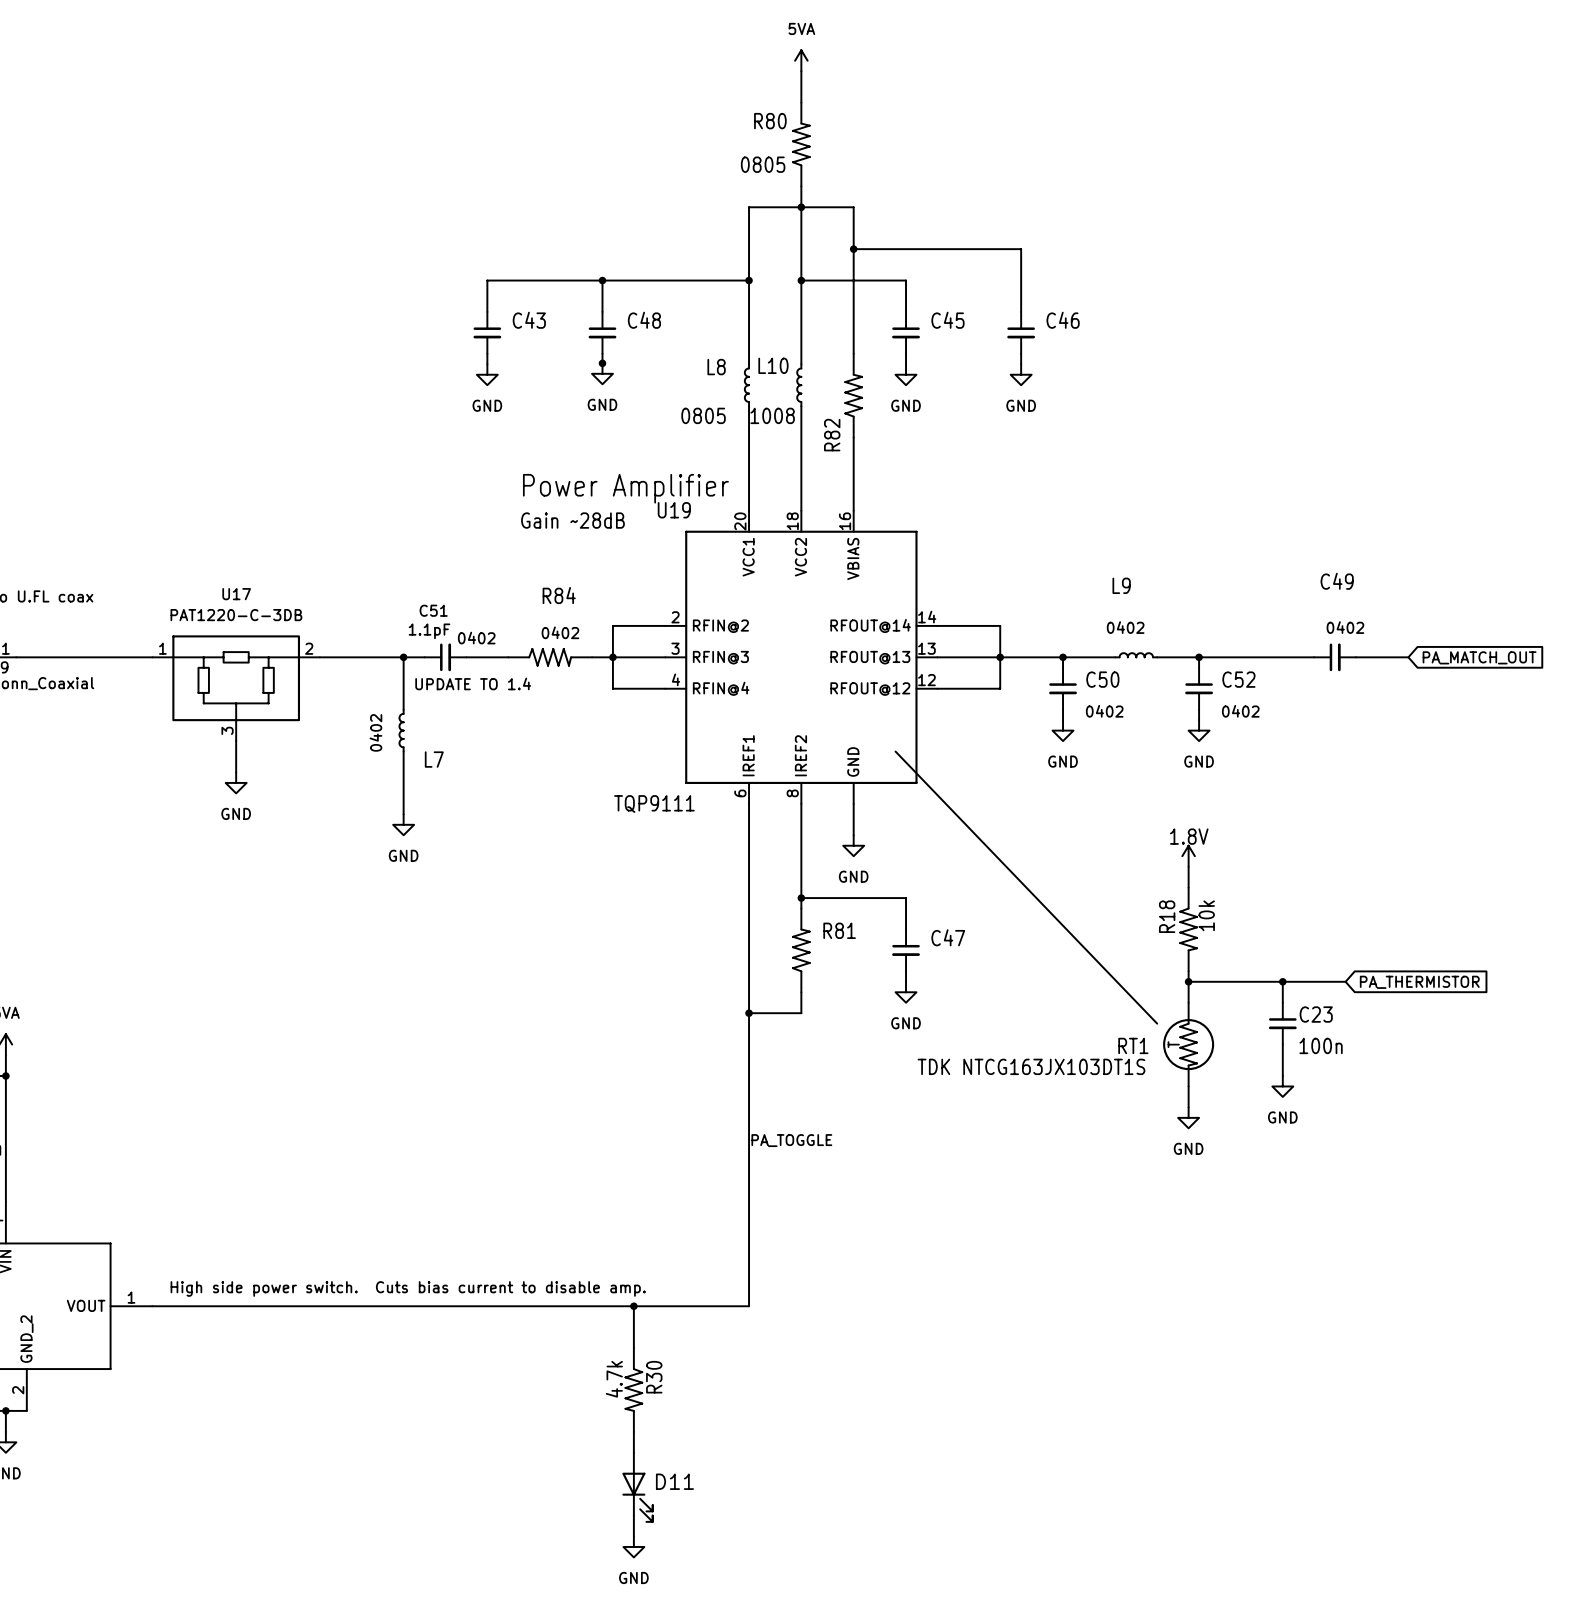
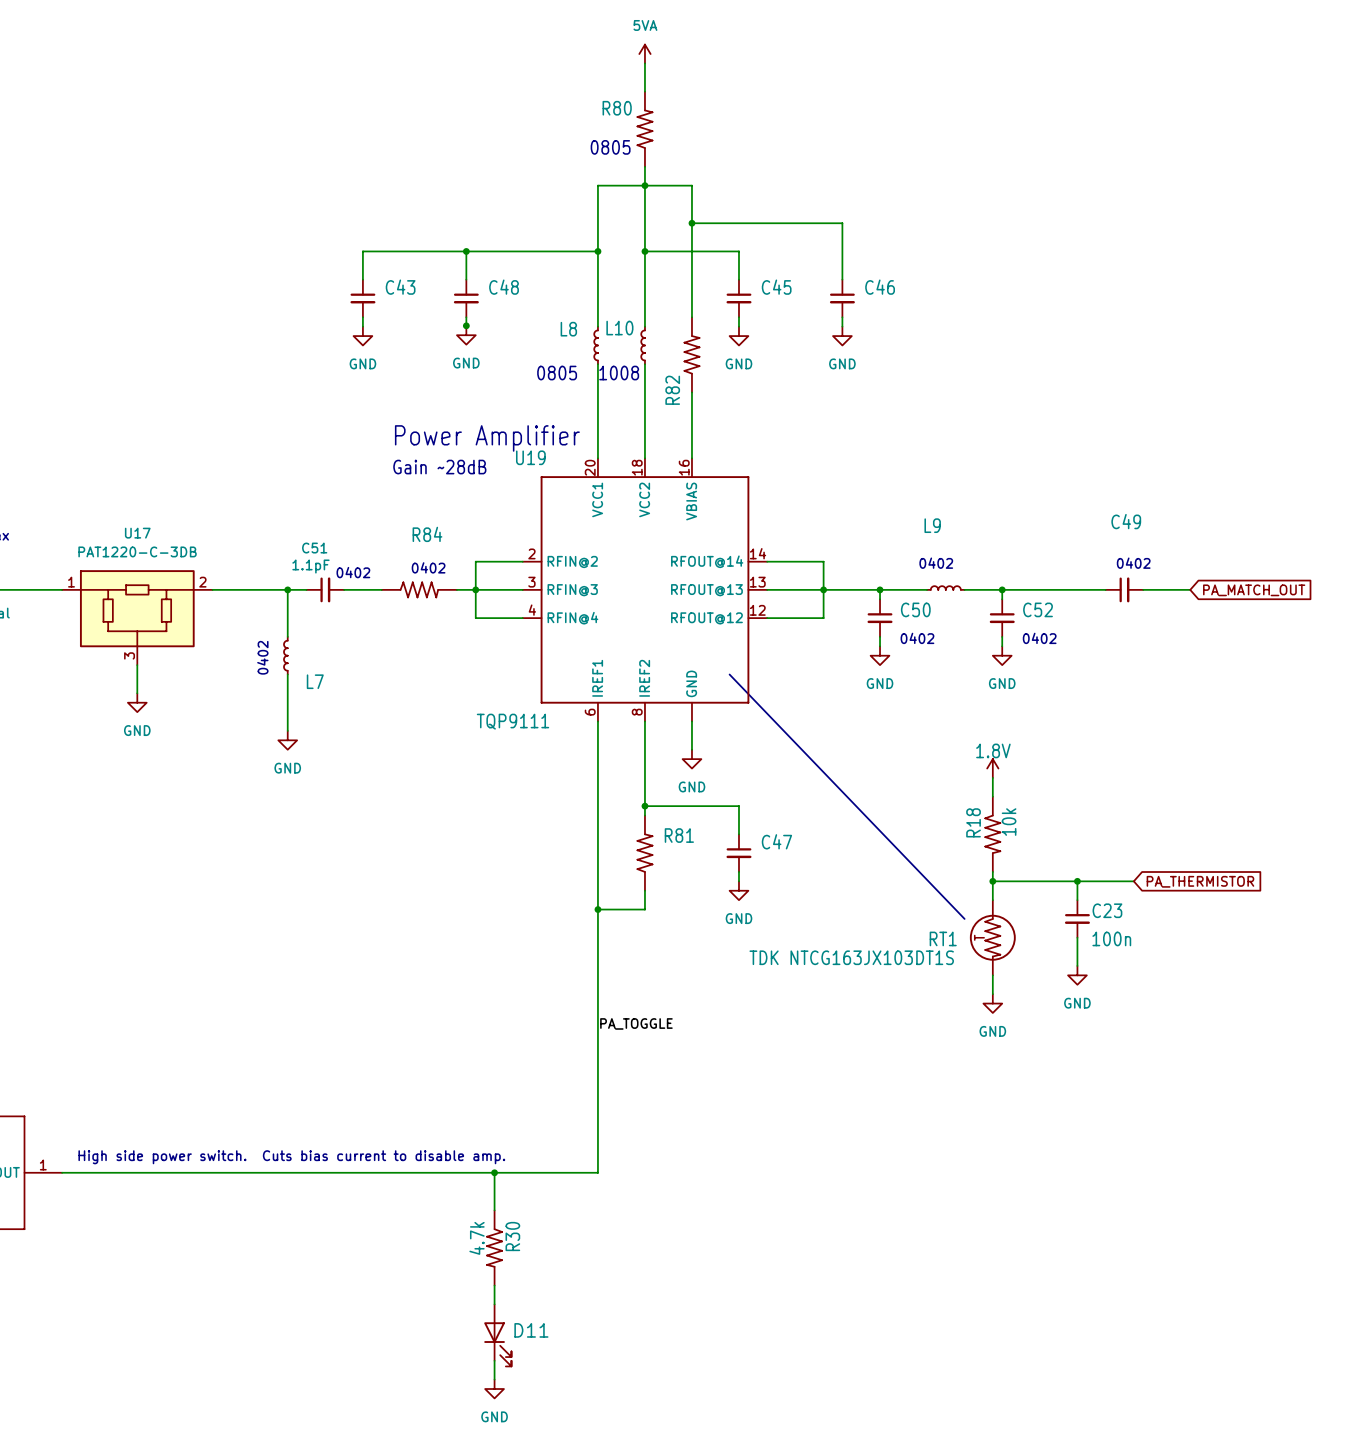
text: UPDATE TO 1.4 (473, 683) -> none

